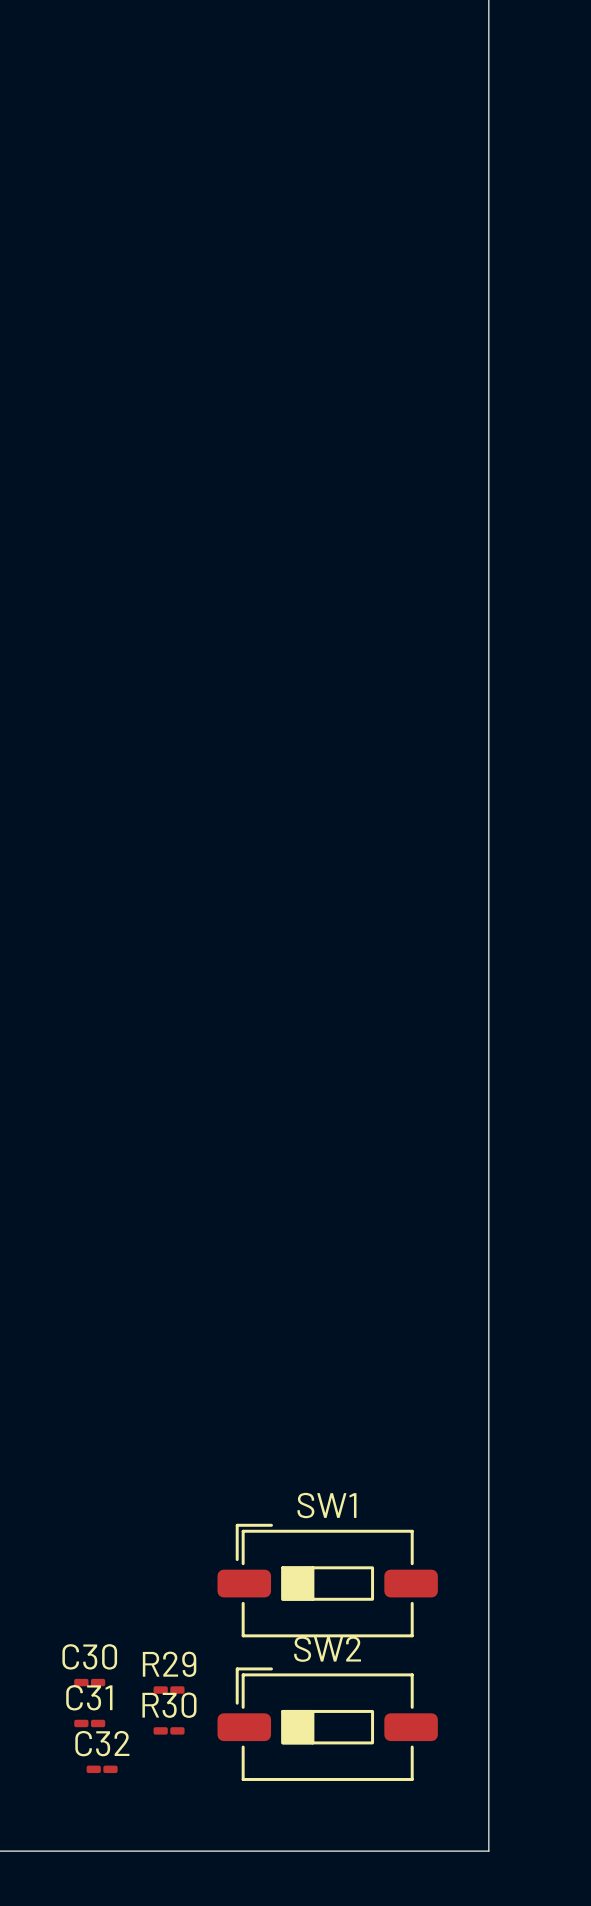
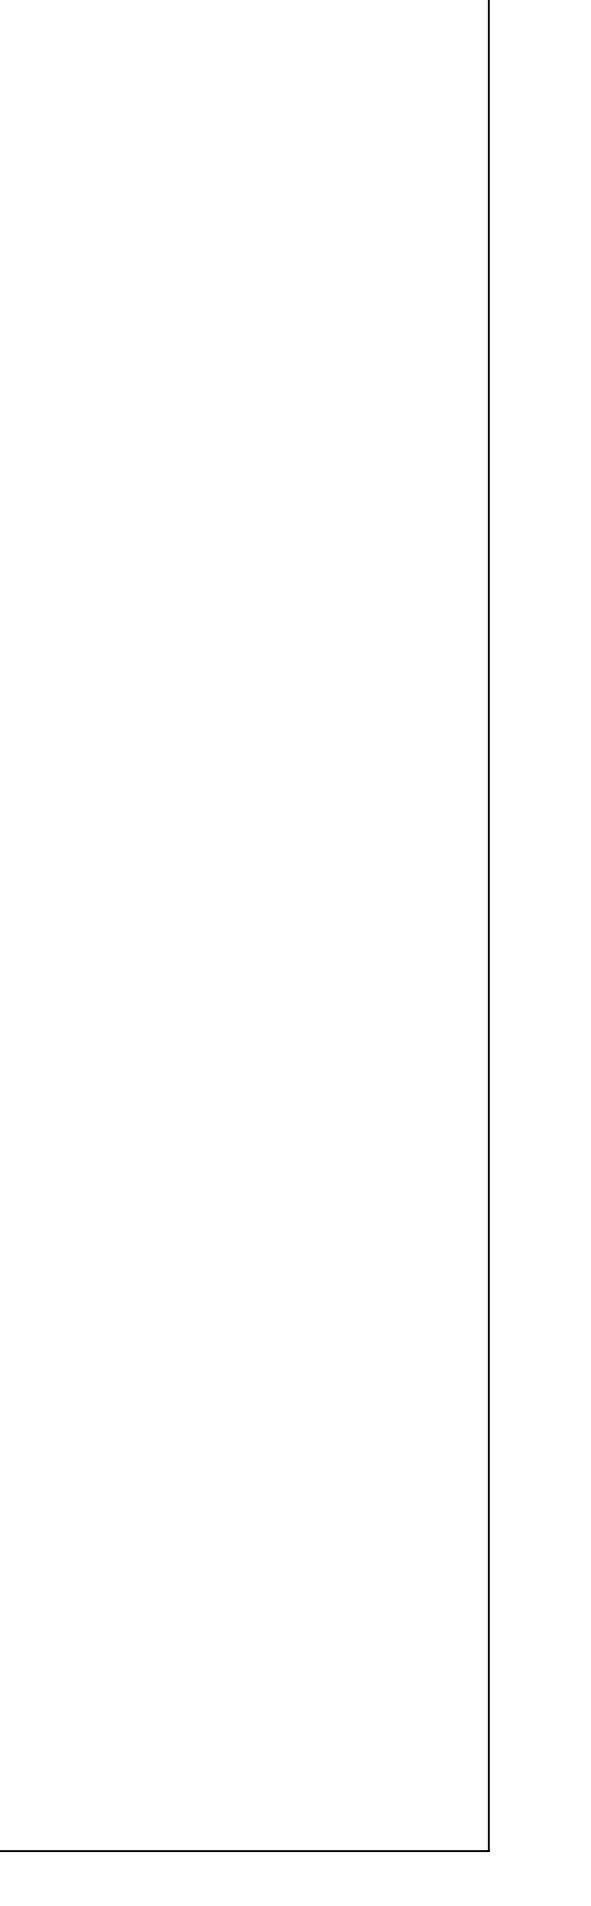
SW1: (327, 1580) -> none
C30: (89, 1682) -> none
R29: (169, 1690) -> none
C31: (89, 1723) -> none
SW2: (327, 1724) -> none
R30: (169, 1730) -> none
C32: (102, 1769) -> none

